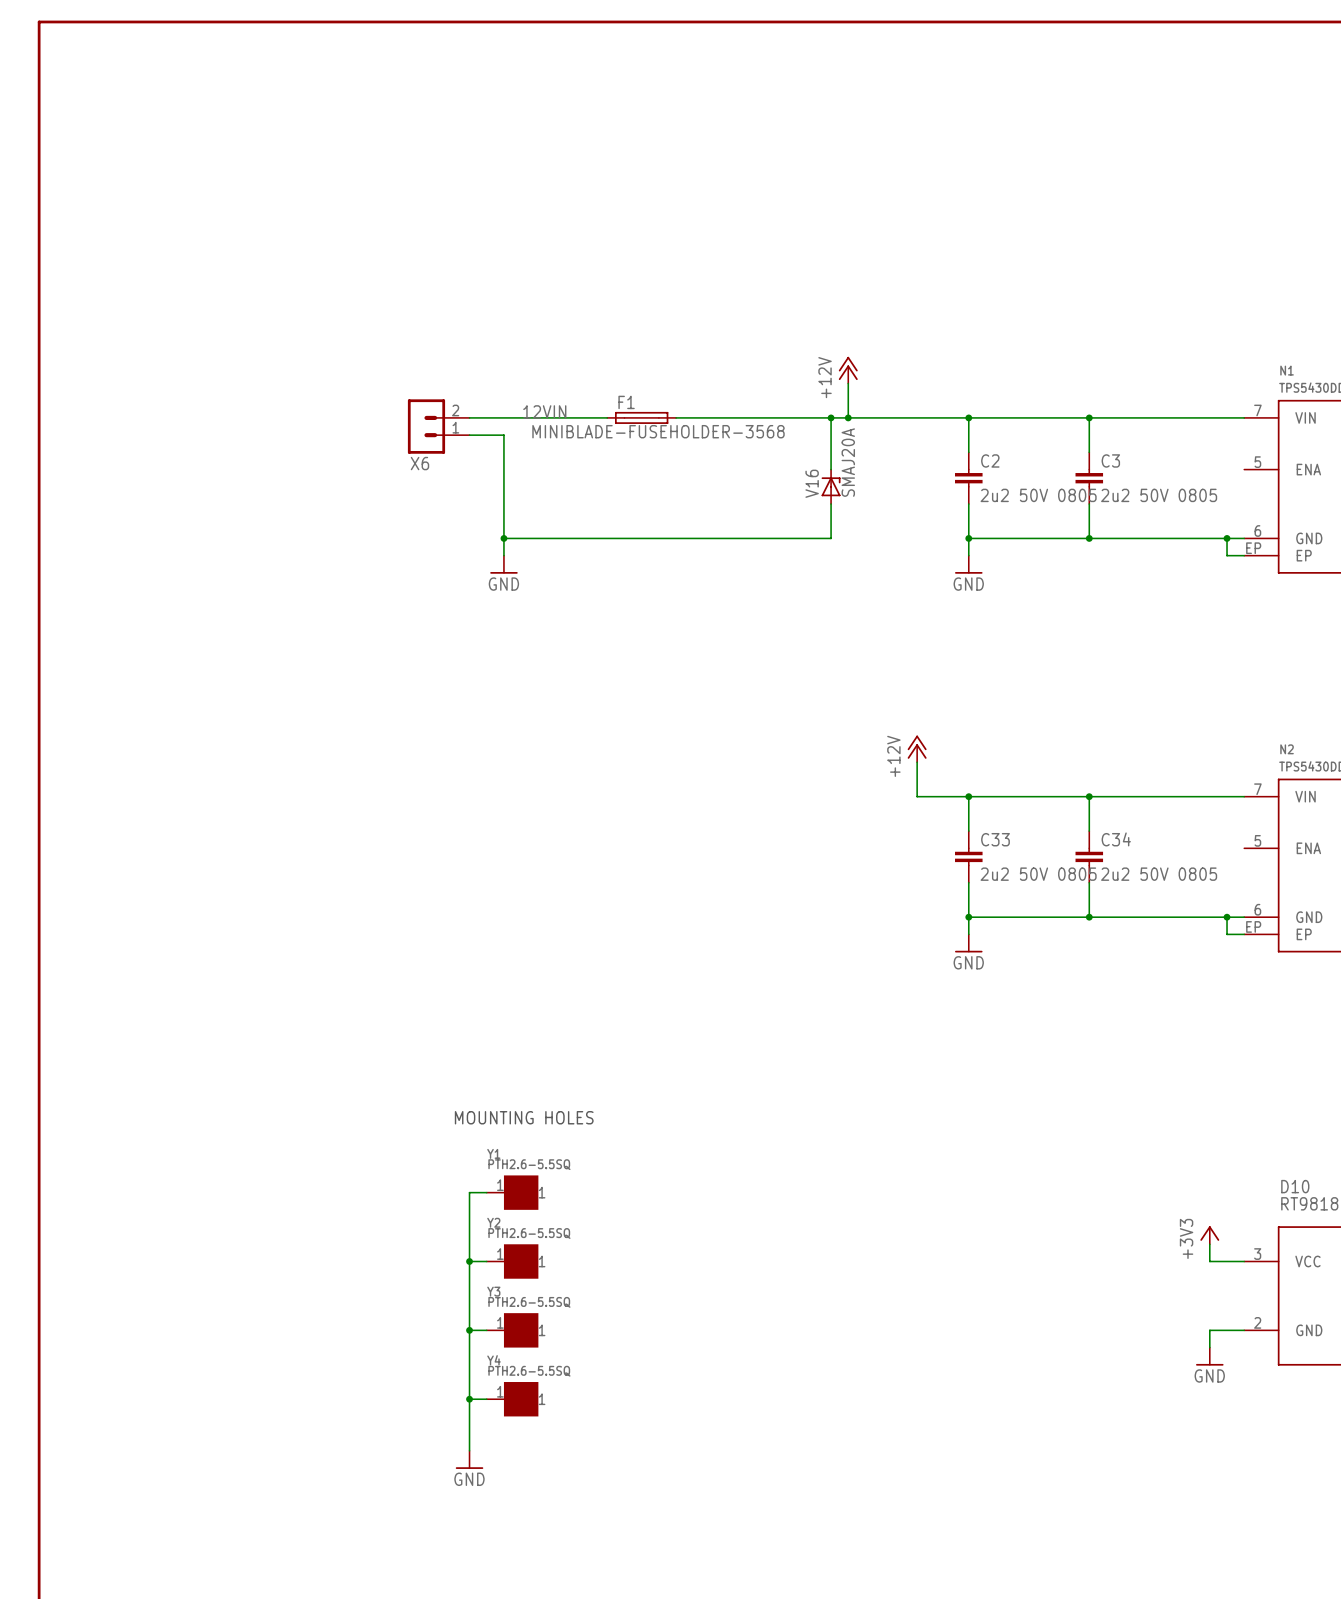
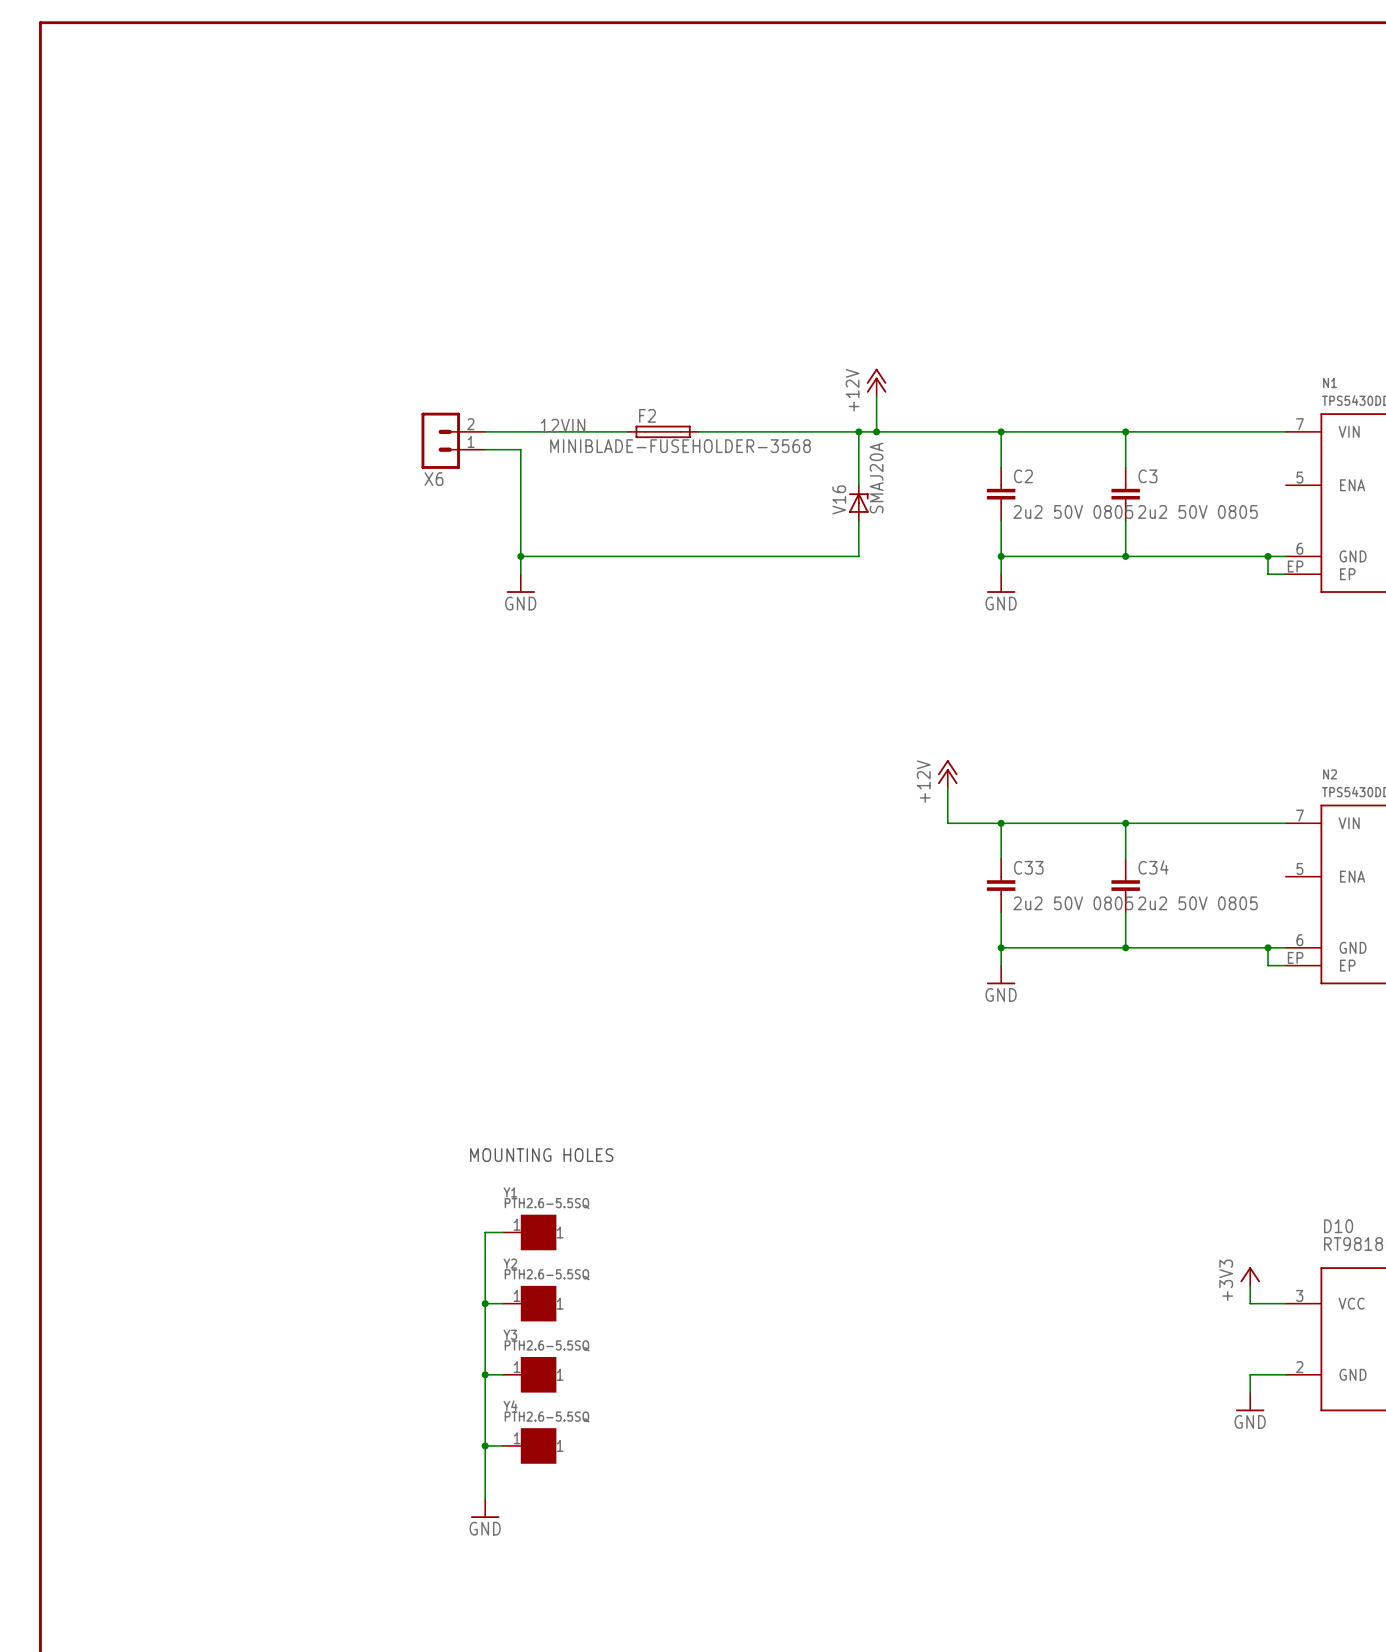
F1 name: F1 (626, 402) -> F2 (647, 415)

